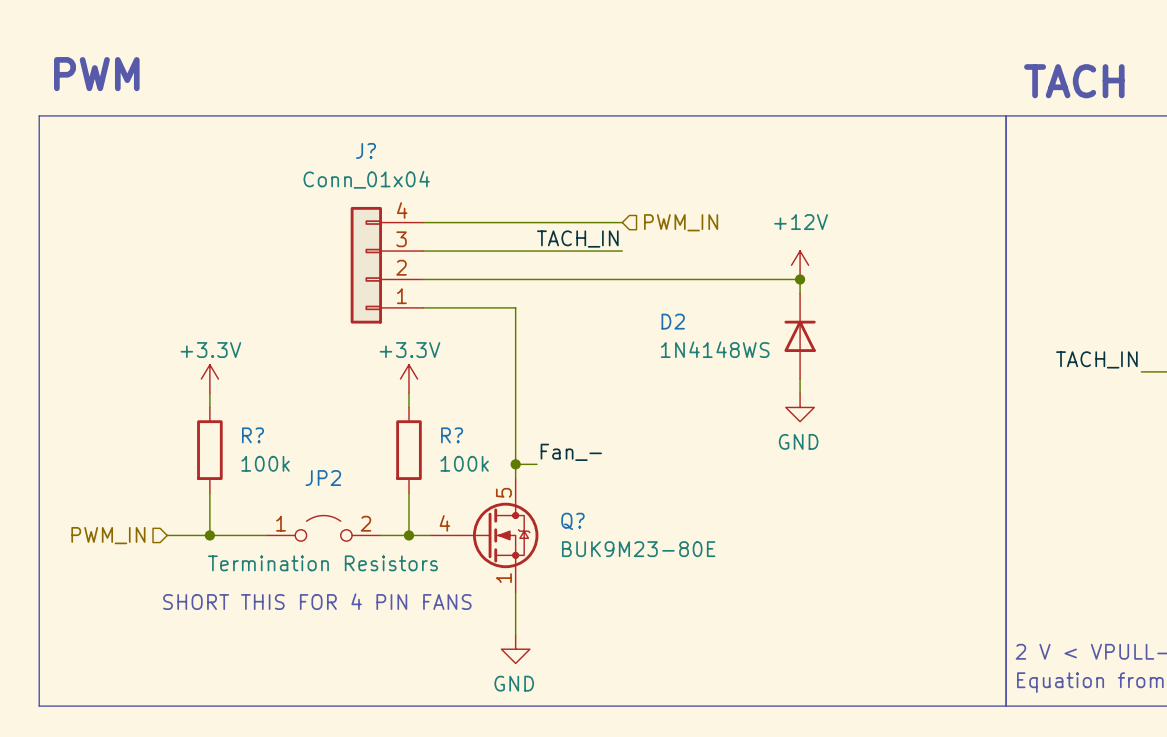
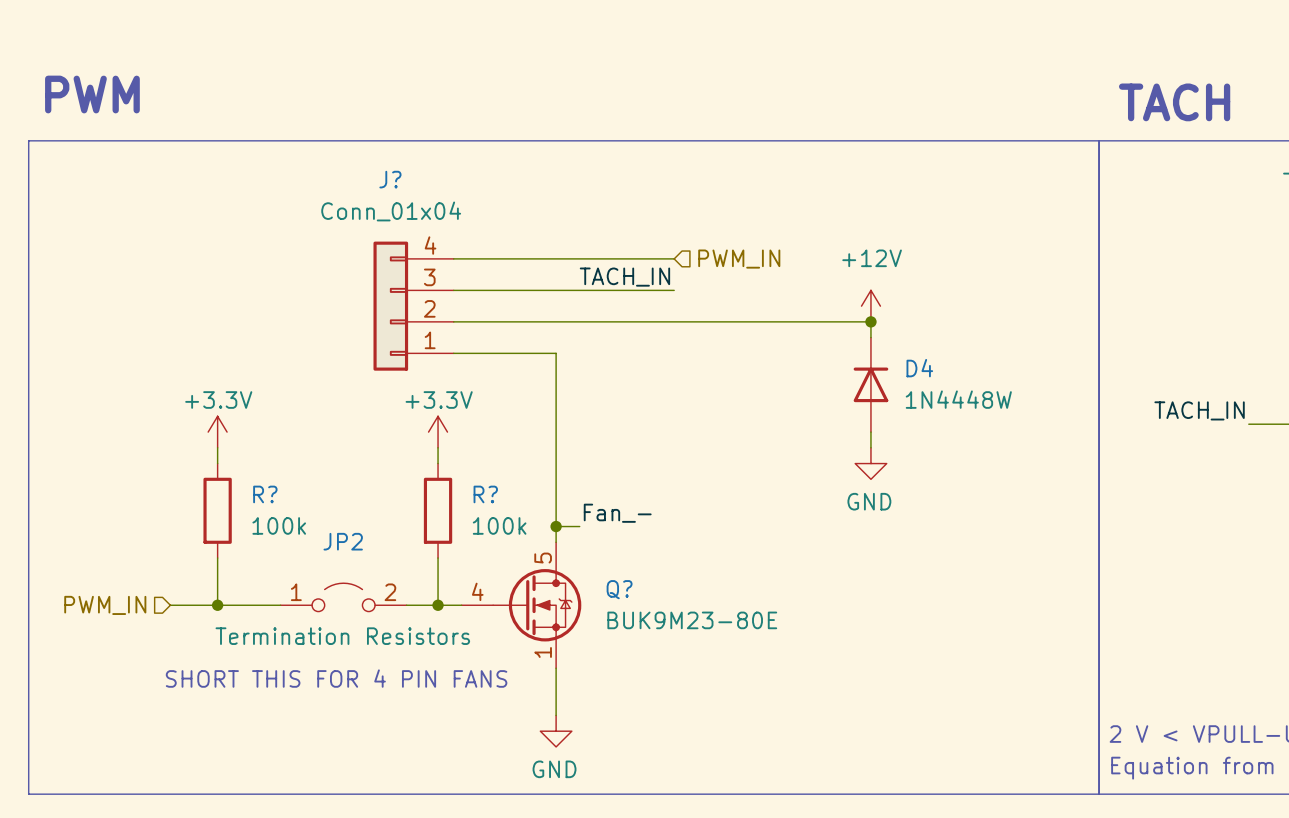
D2 name: D2 (673, 321) -> D4 (919, 368)
D2 value: 1N4148WS (715, 349) -> 1N4448W (958, 399)

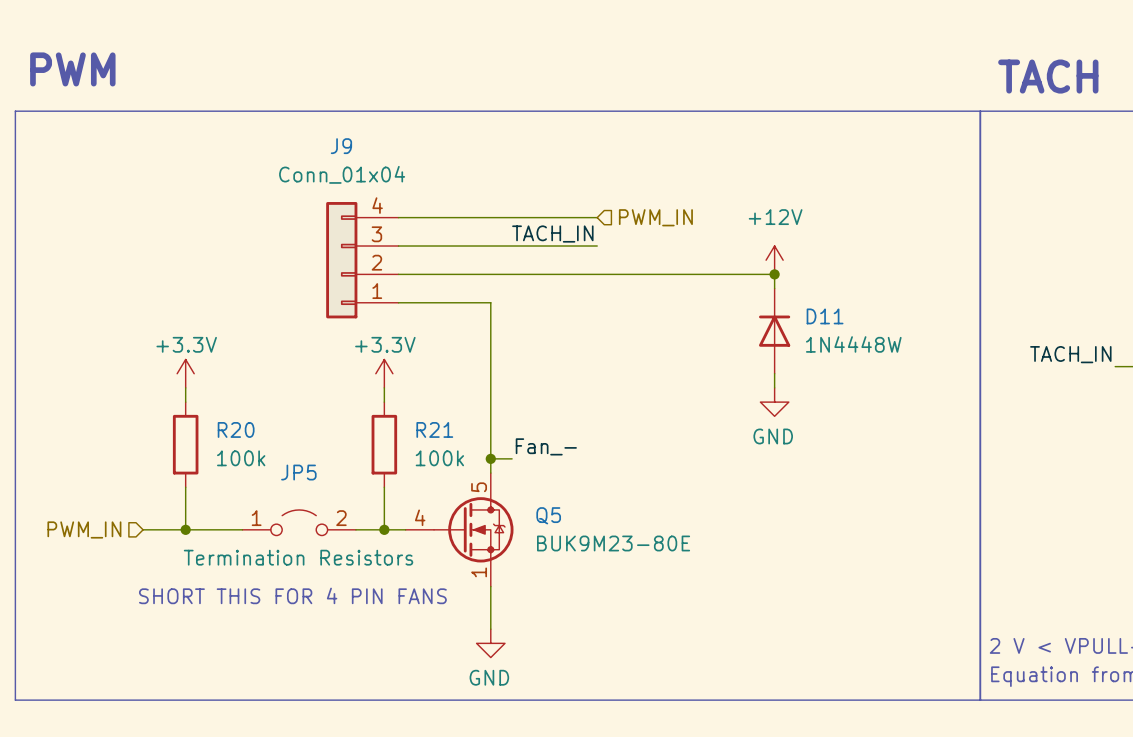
J? name: J? (390, 179) -> J9 (341, 146)
D4 name: D4 (919, 368) -> D11 (825, 316)
R? name: R? (265, 494) -> R20 (236, 429)
R? name: R? (485, 494) -> R21 (434, 429)
JP2 name: JP2 (343, 541) -> JP5 (298, 472)
Q? name: Q? (619, 589) -> Q5 (548, 515)

